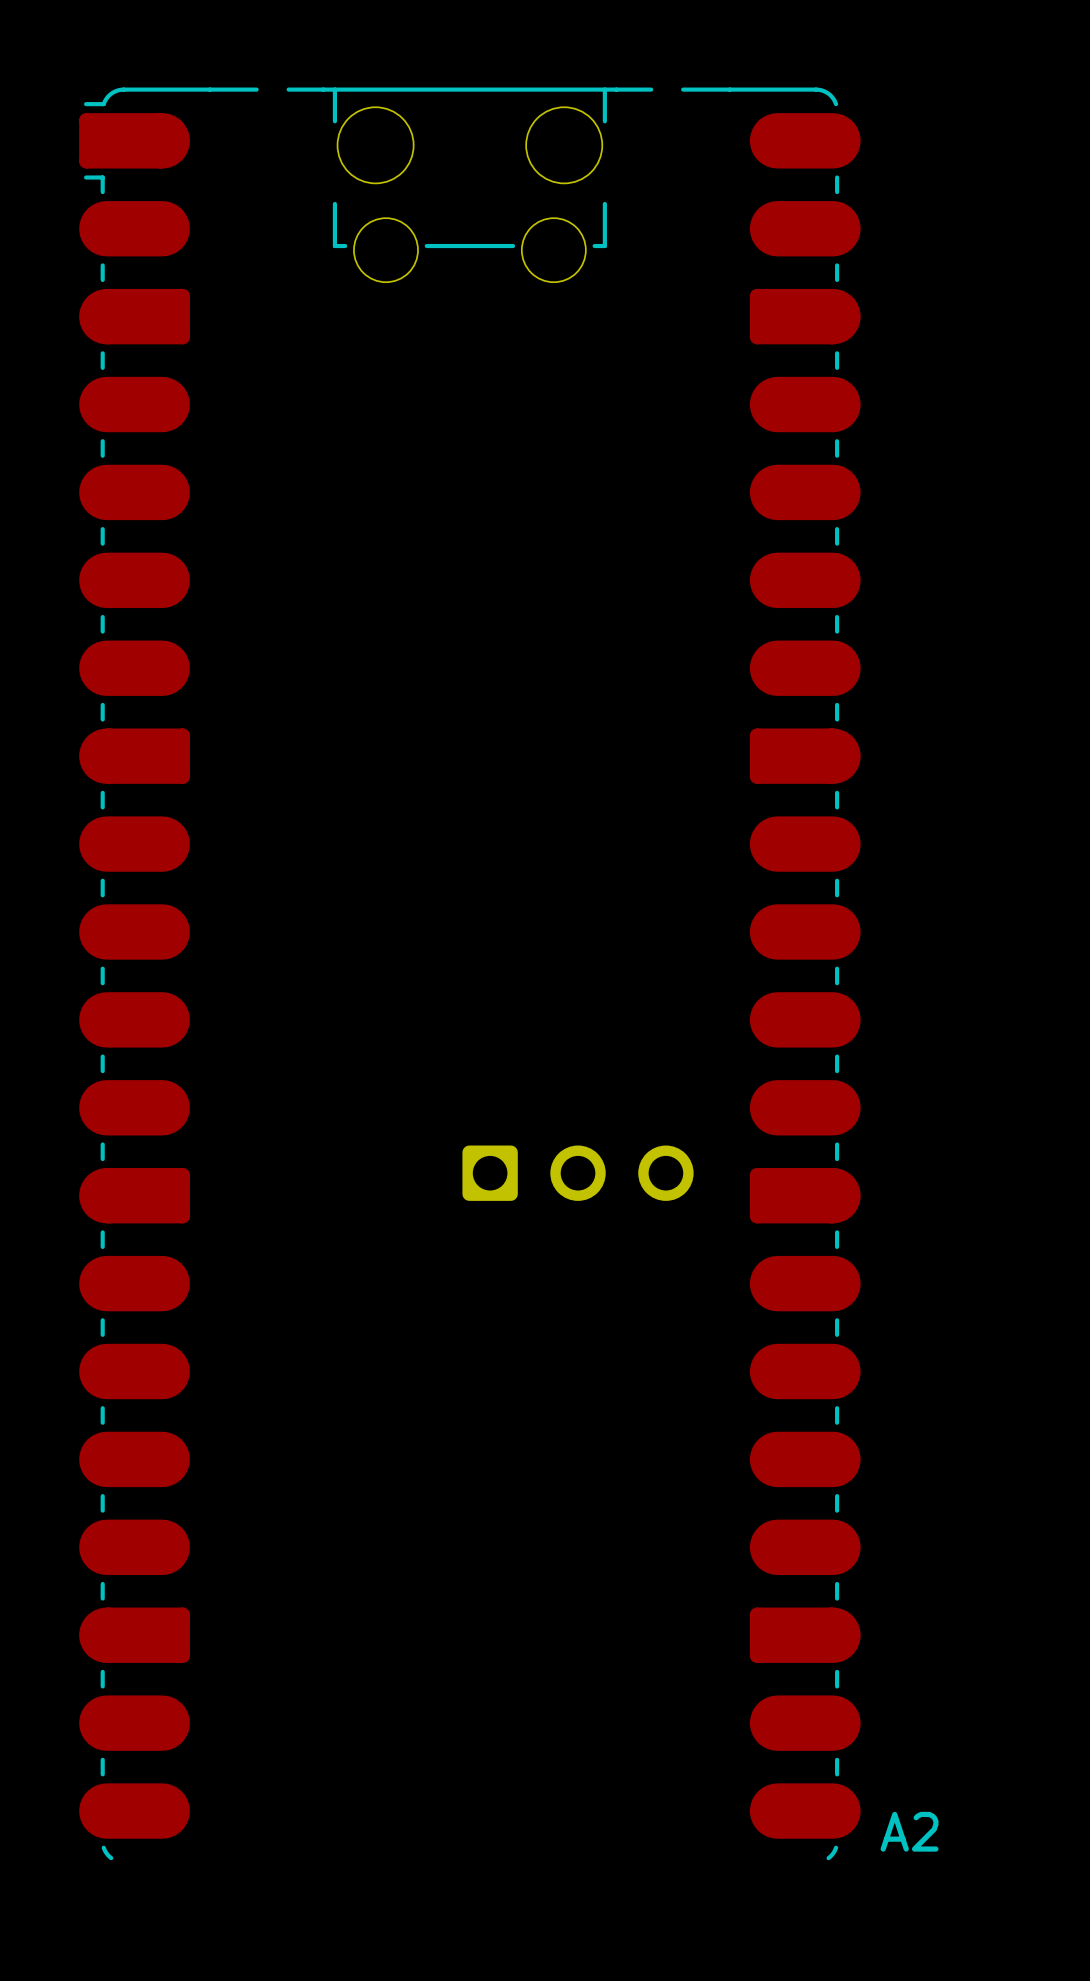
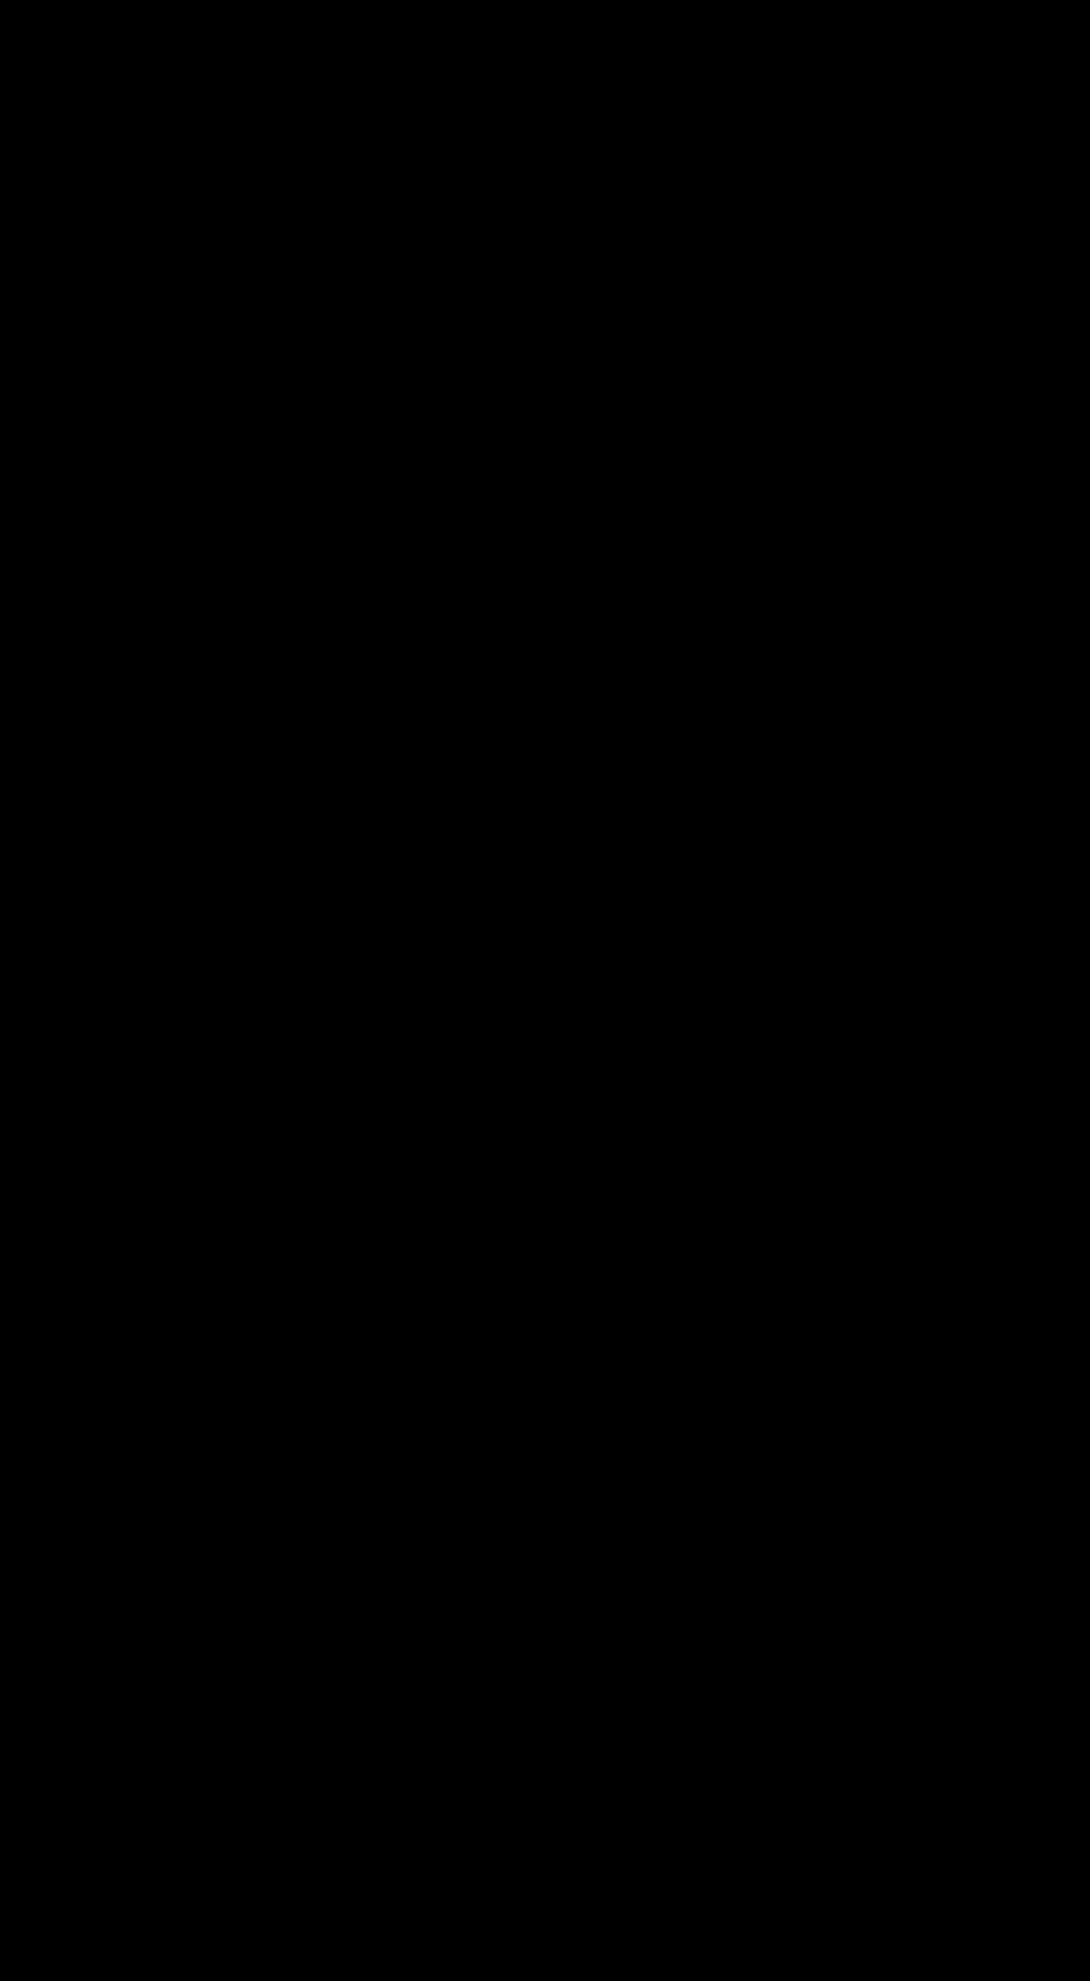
A2: (469, 973) -> none

